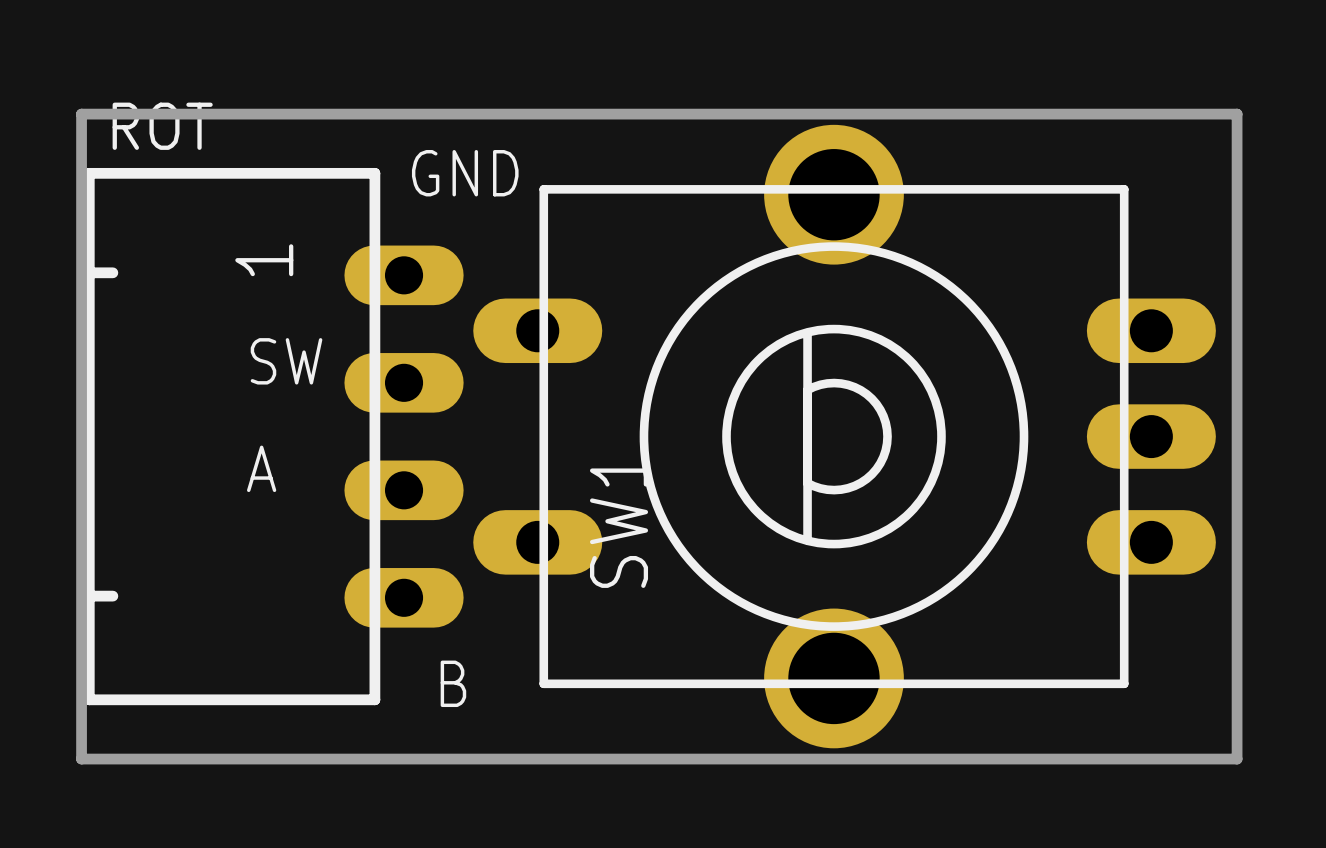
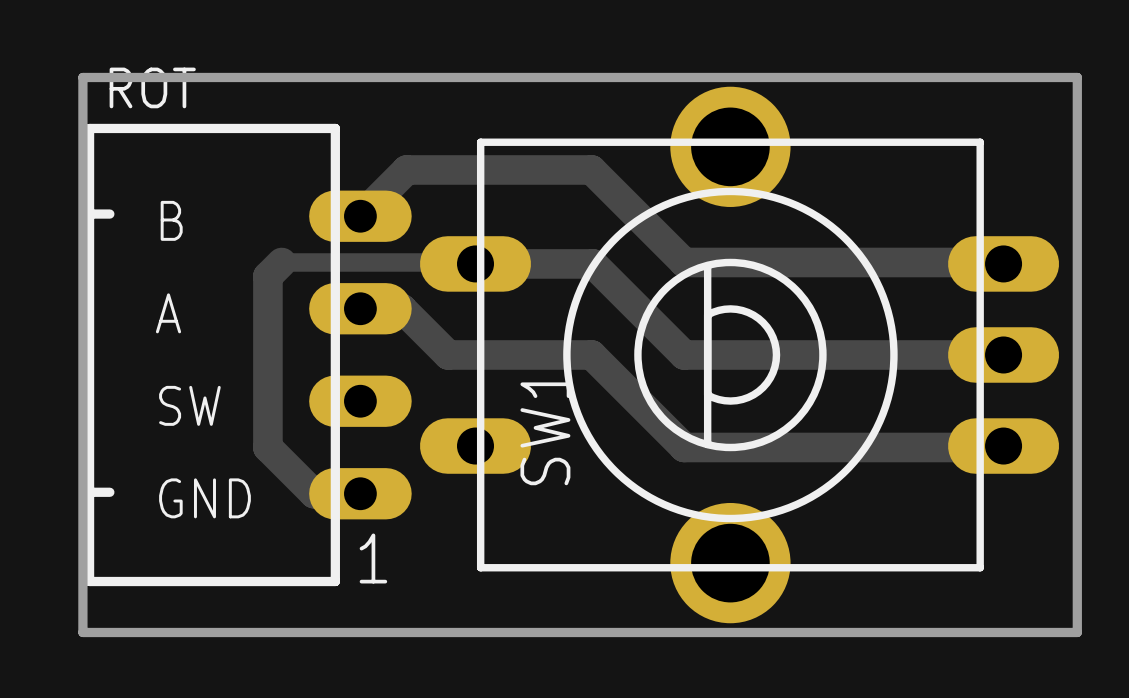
text position: GND (465, 173) -> GND (204, 498)
text rotation: 0° (264, 260) -> 90° clockwise (373, 558)
text position: 1 (264, 260) -> 1 (373, 558)
track: none -> (360, 216) (406, 169) (591, 169) (684, 262) (1003, 263)
text position: SW (286, 361) -> SW (189, 405)
track: none -> (360, 308) (402, 308) (448, 354) (591, 354) (684, 447) (1003, 446)
track: none -> (1003, 354) (684, 354) (593, 263) (281, 262) (267, 276) (267, 447) (314, 493) (360, 493)
text position: A (261, 468) -> A (168, 313)
text position: B (453, 683) -> B (171, 220)

